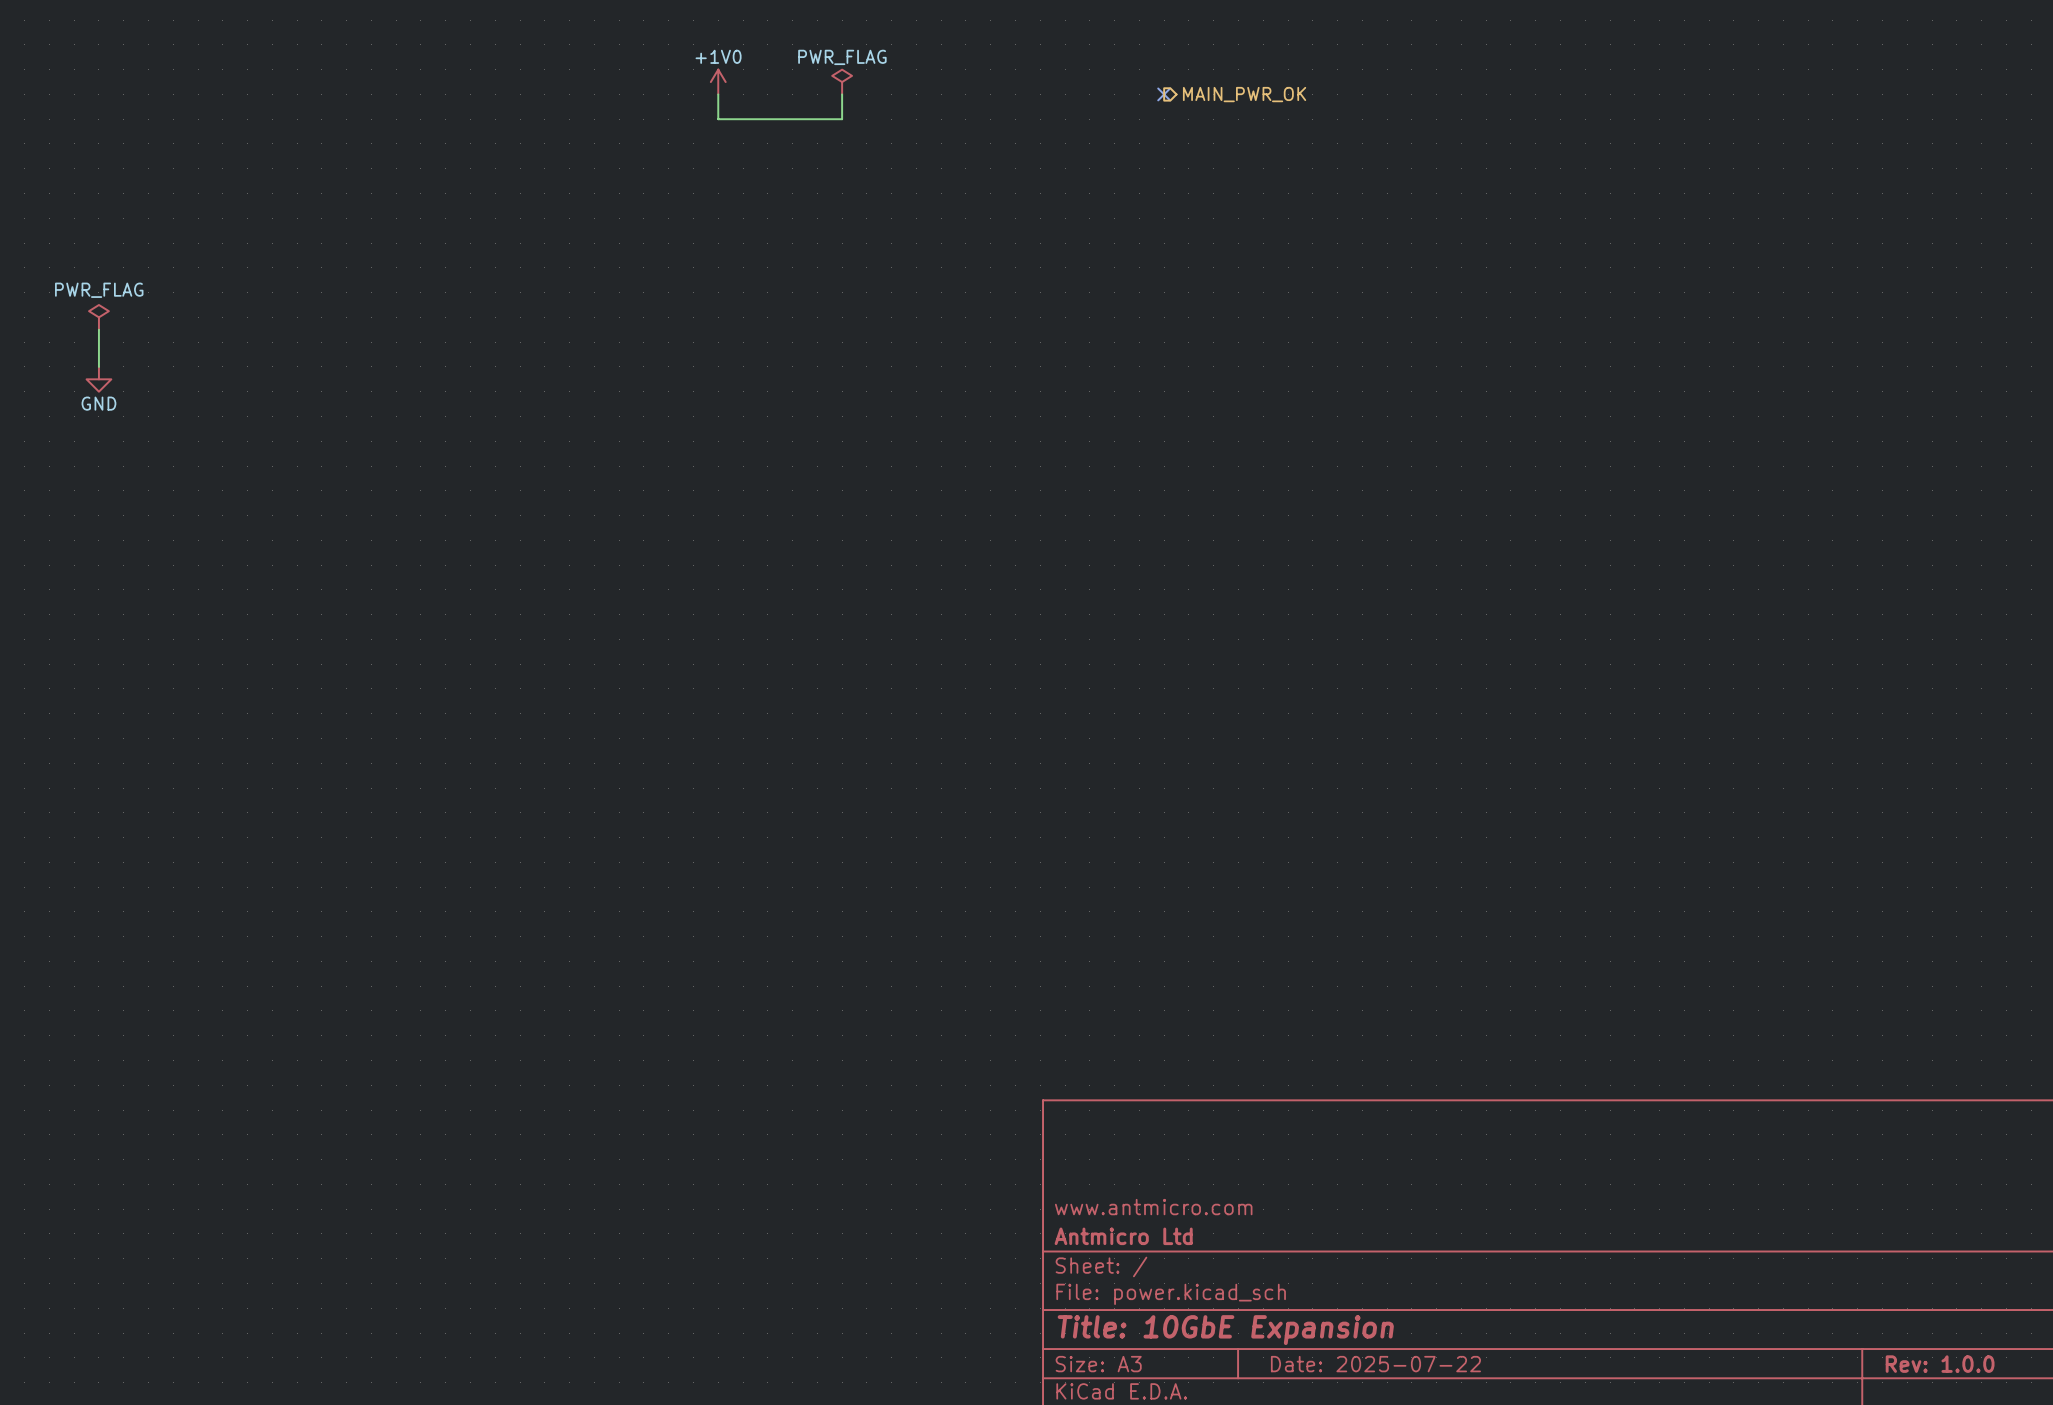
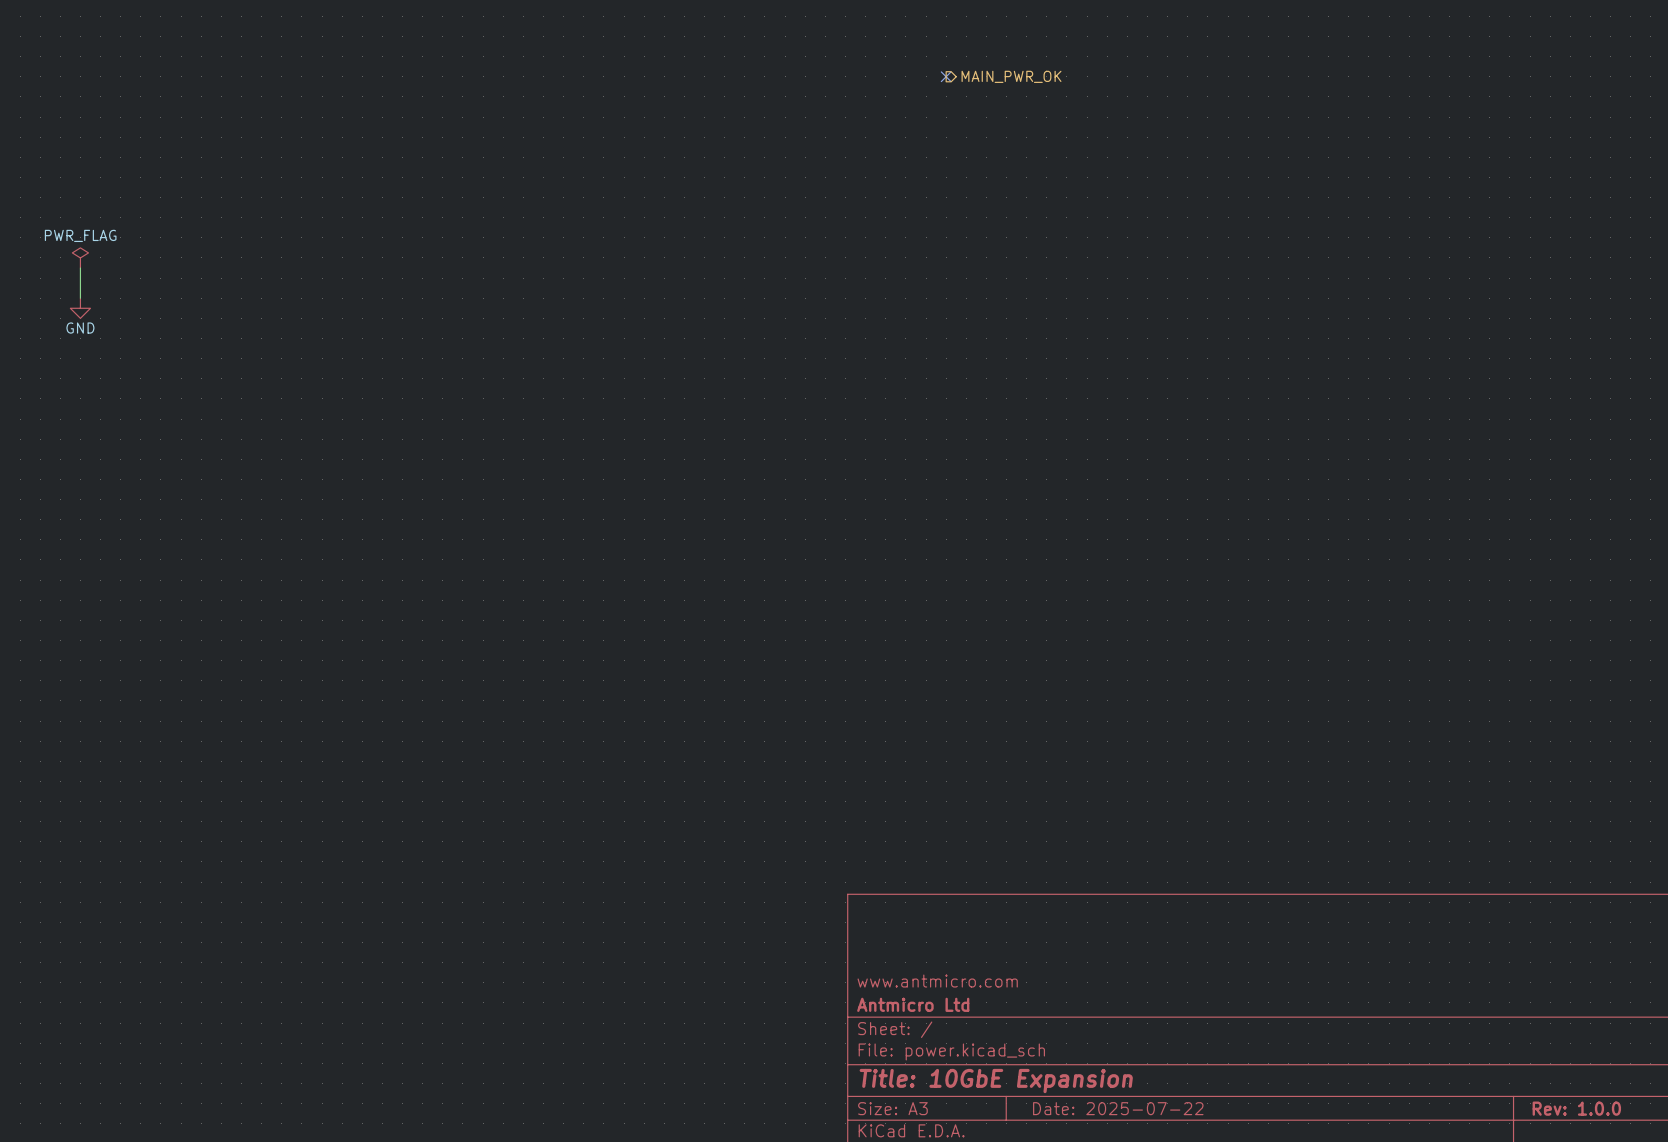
power symbol: +1V0 (718, 82) -> none
power symbol: PWR_FLAG (842, 82) -> none
wire: (718, 94) (718, 119) (842, 119) (842, 94) -> none

